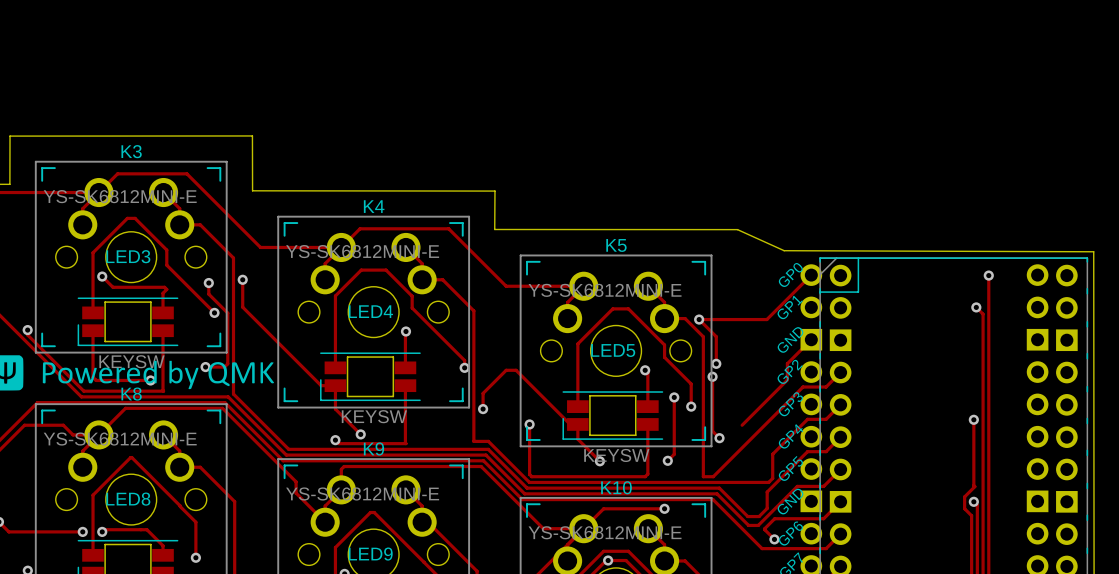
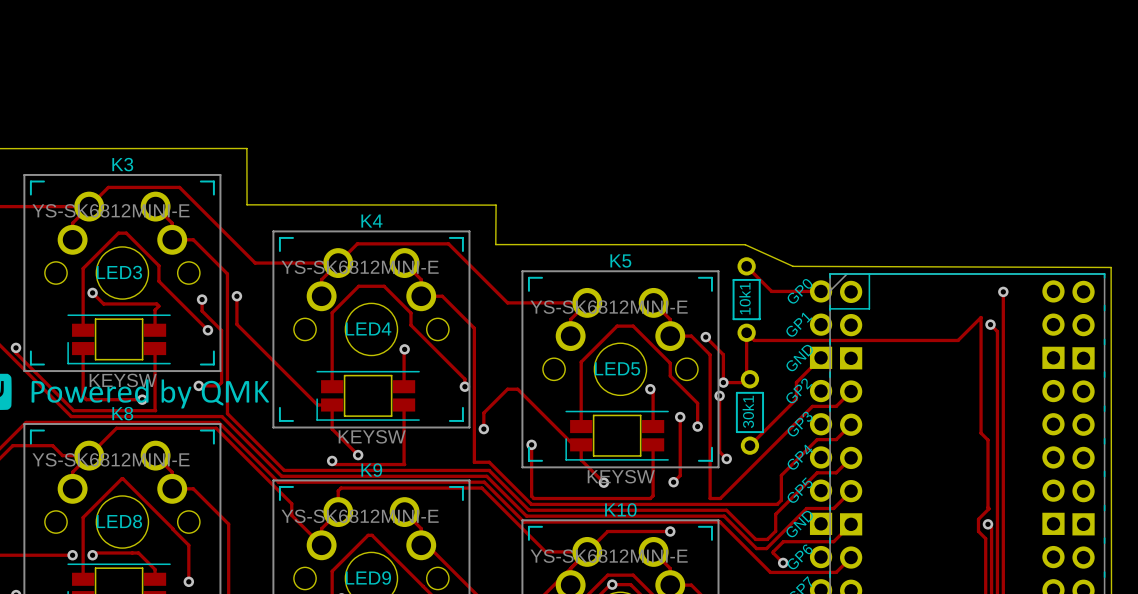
track: (811, 275) (766, 319) (699, 319) -> (821, 291) (771, 291) (746, 266)
10k1: none -> (746, 299)
track: none -> (723, 382) (746, 382) (749, 379) (746, 375) (746, 332) (754, 340) (958, 340) (981, 317) (981, 433) (987, 440)
30k1: none -> (749, 412)
via: (973, 419) -> none

